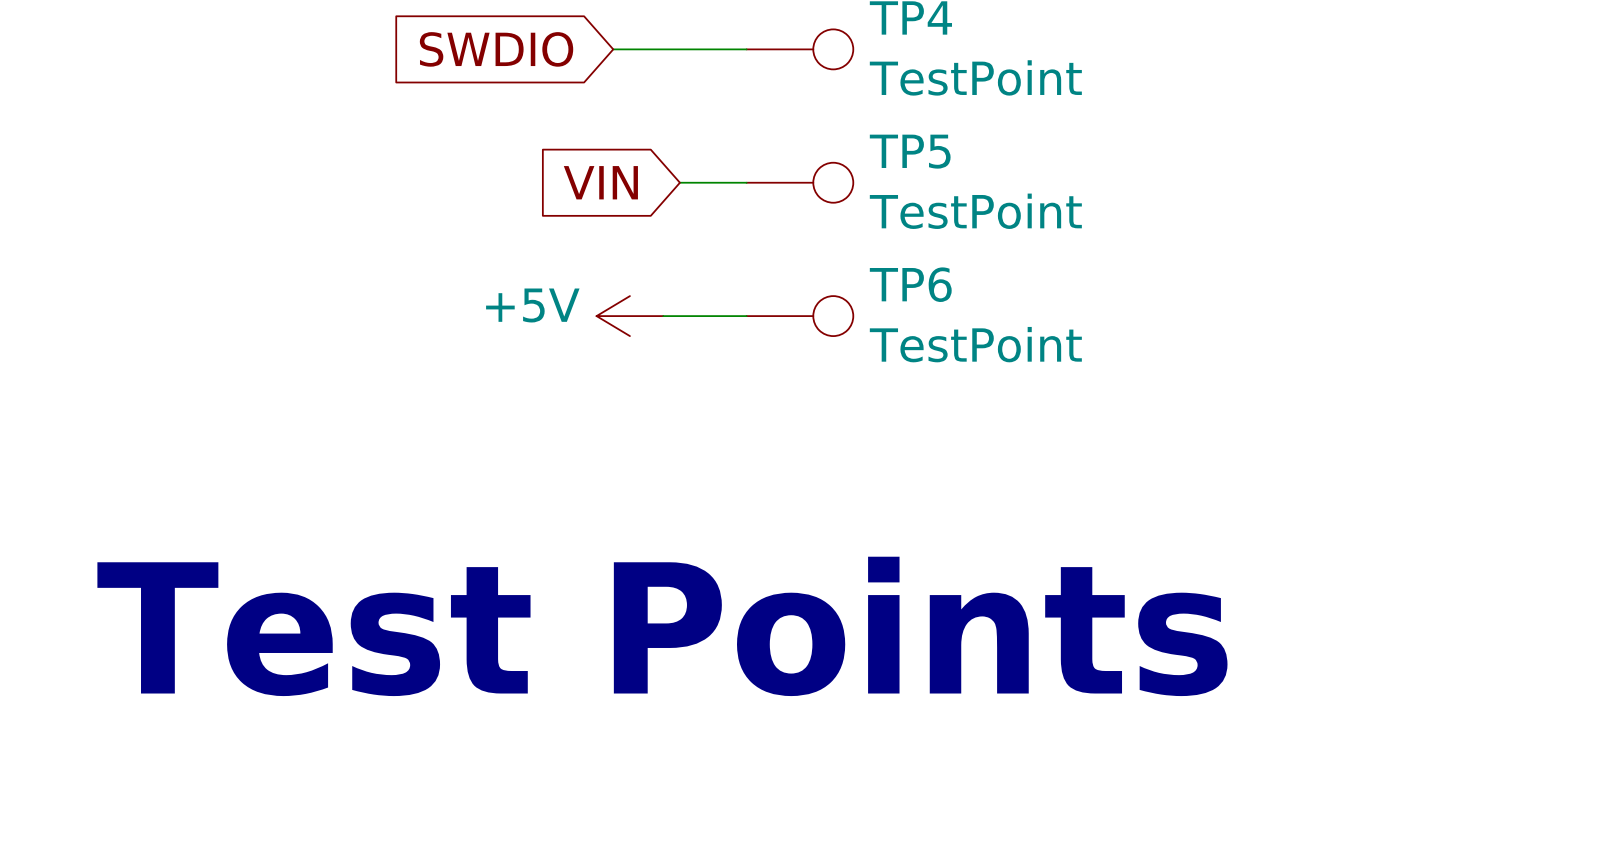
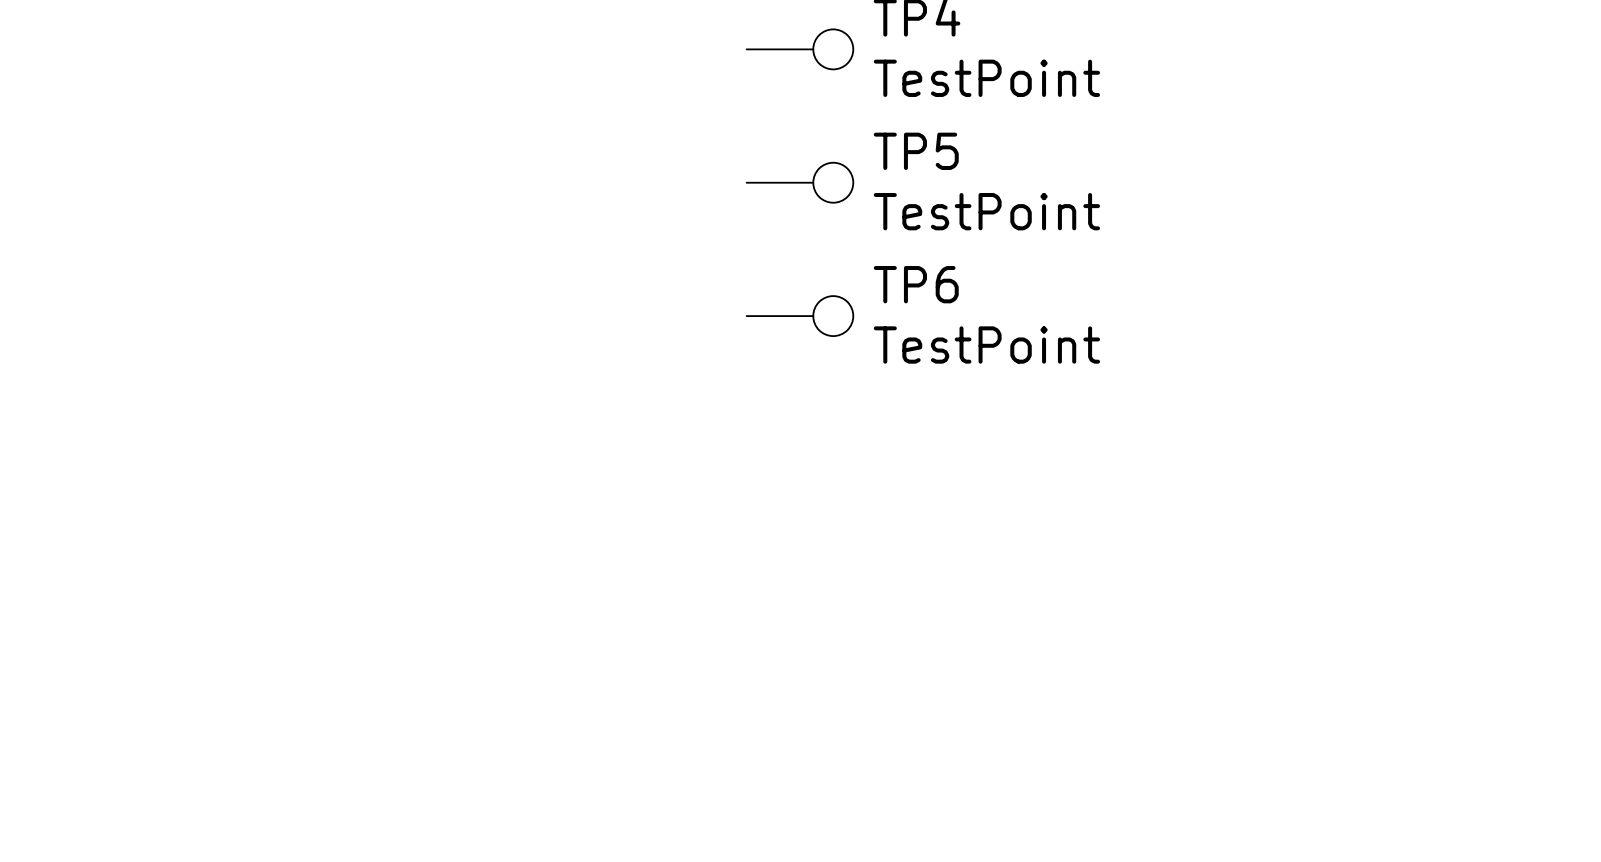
global label: SWDIO (496, 49) -> none
wire: (613, 49) (746, 49) -> none
global label: VIN (600, 182) -> none
wire: (679, 182) (746, 182) -> none
power symbol: +5V (629, 316) -> none
wire: (663, 316) (746, 316) -> none
text: Test Points (662, 626) -> none

